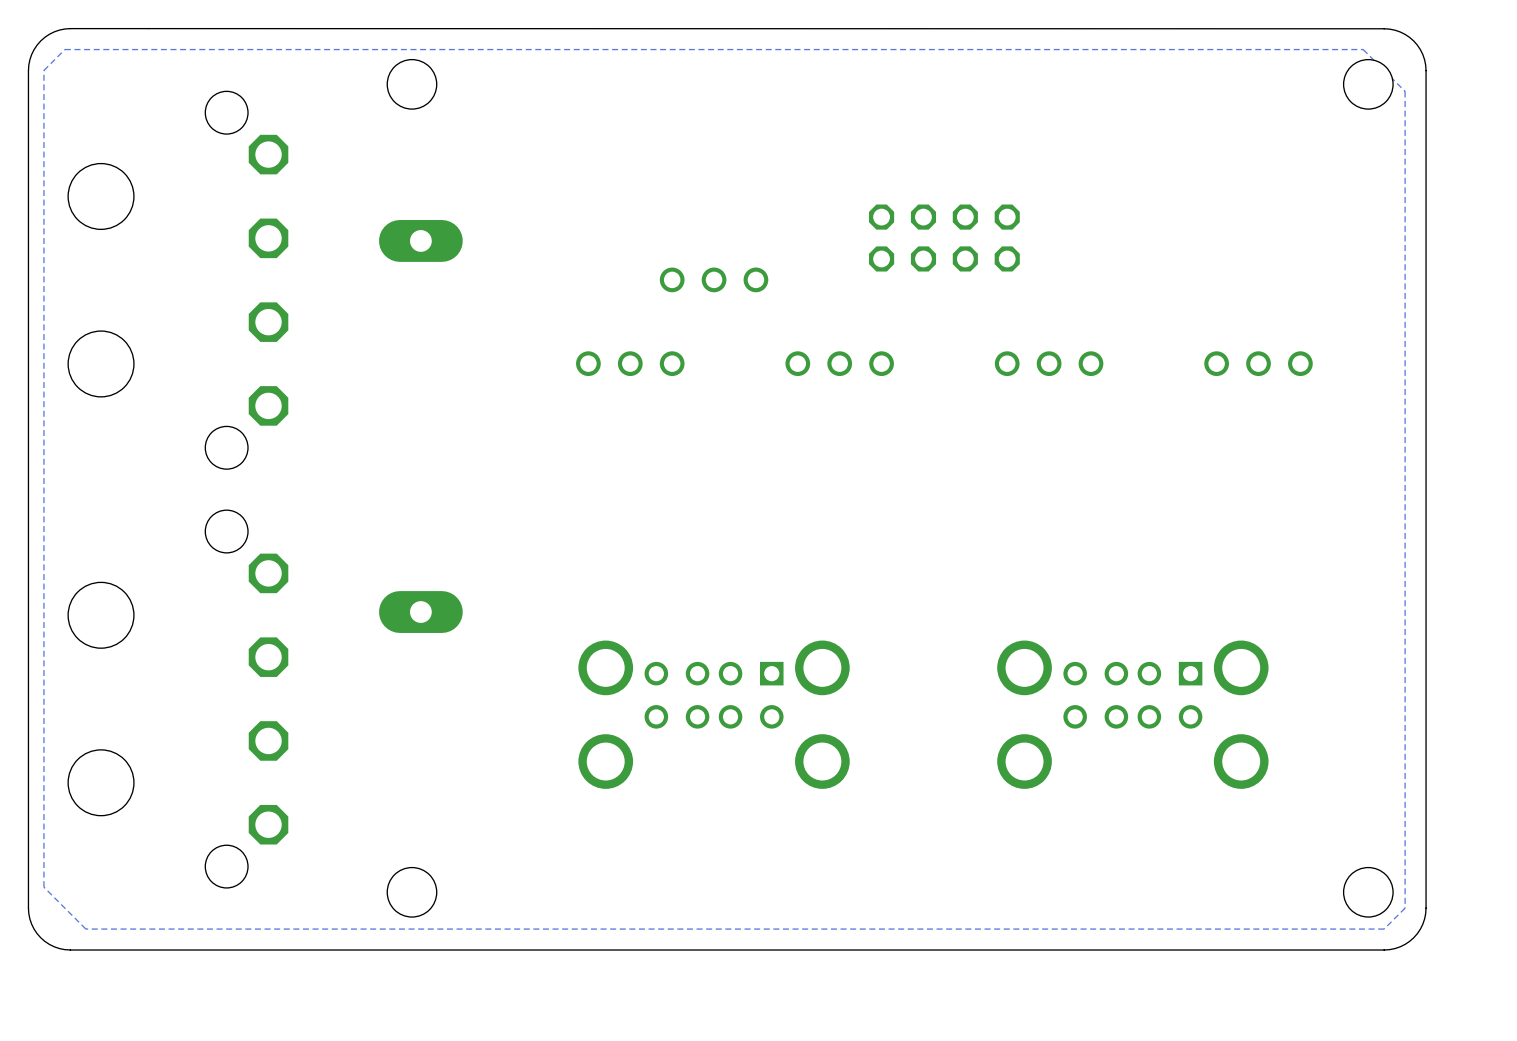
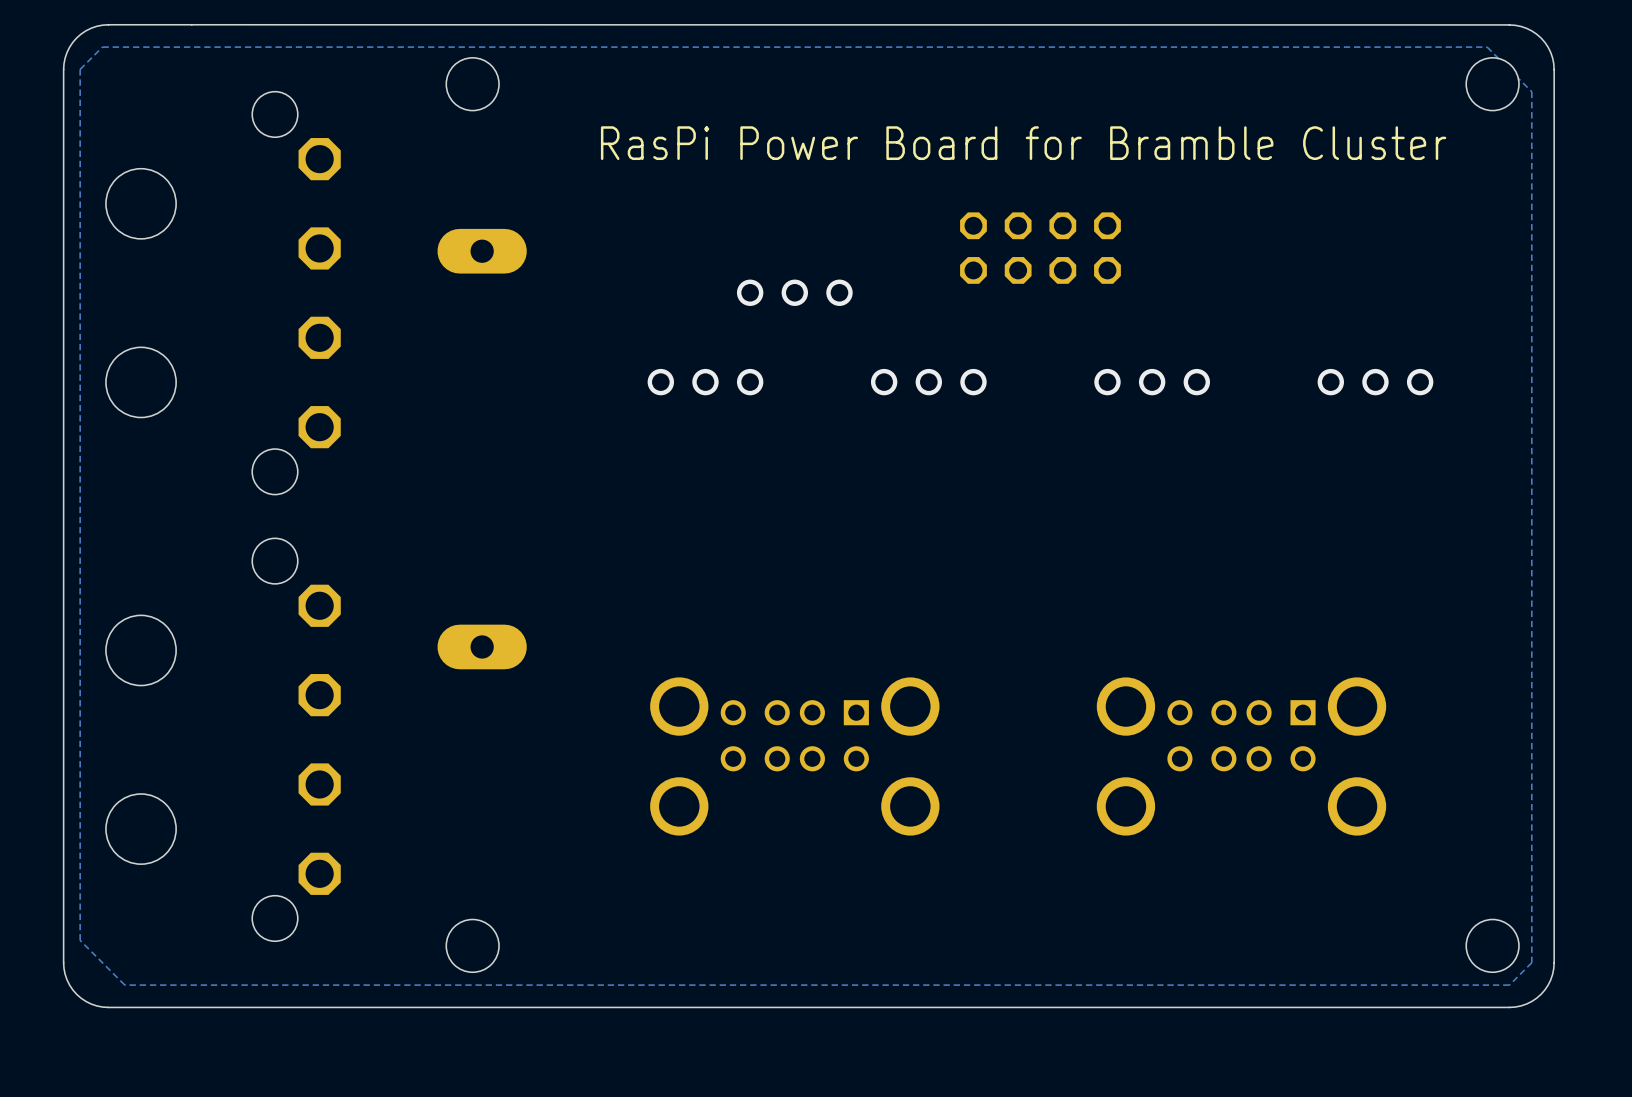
text: none -> RasPi Power Board for Bramble Cluster (1023, 143)

